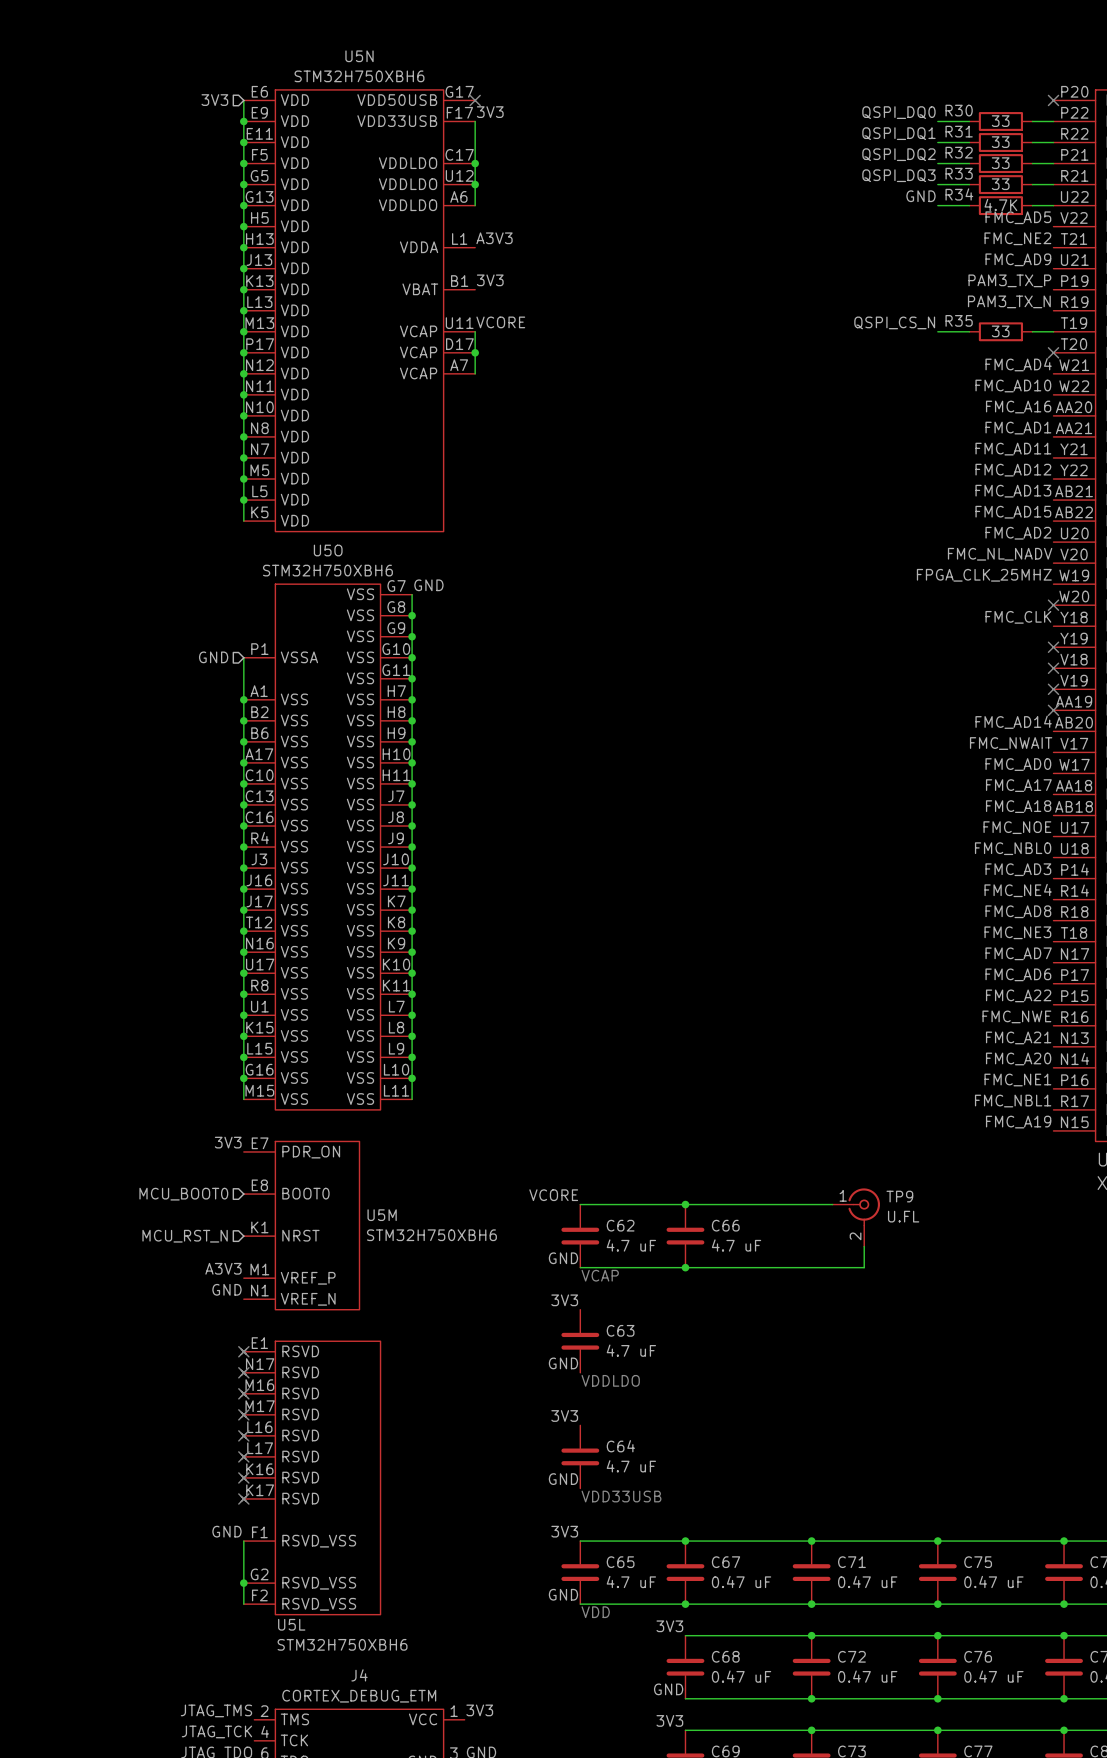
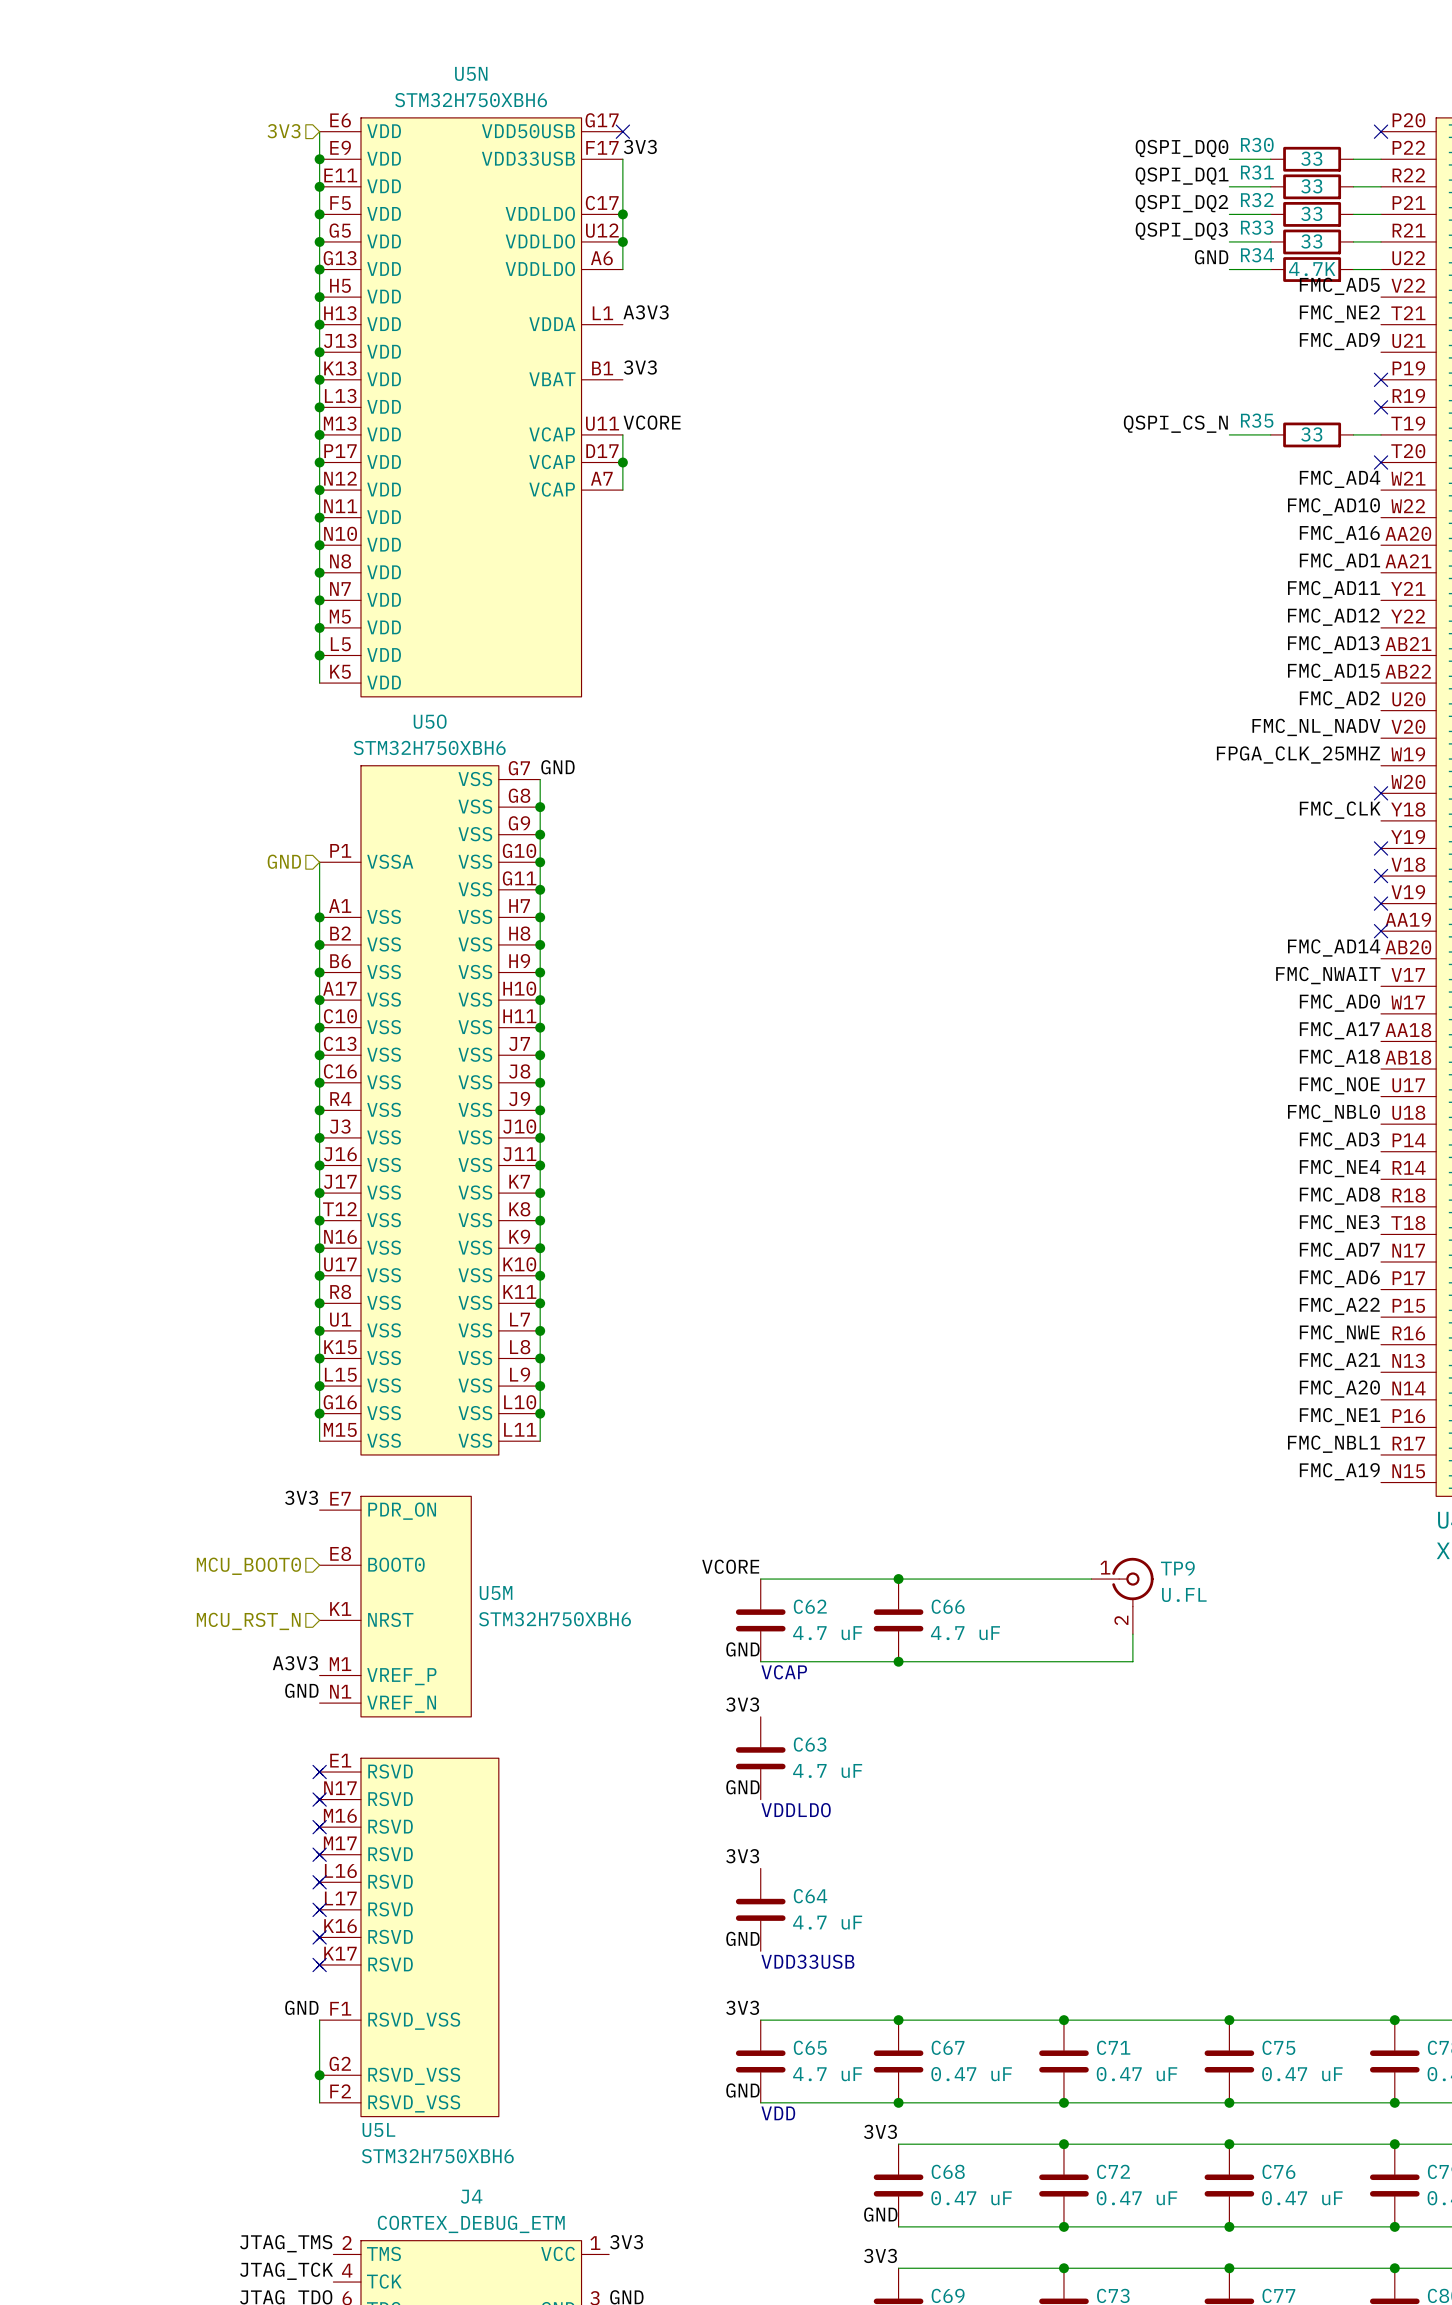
label: PAM3_TX_P (1009, 280) -> none
no-connect mark: none -> (1381, 379)
label: PAM3_TX_N (1009, 301) -> none
no-connect mark: none -> (1381, 407)

